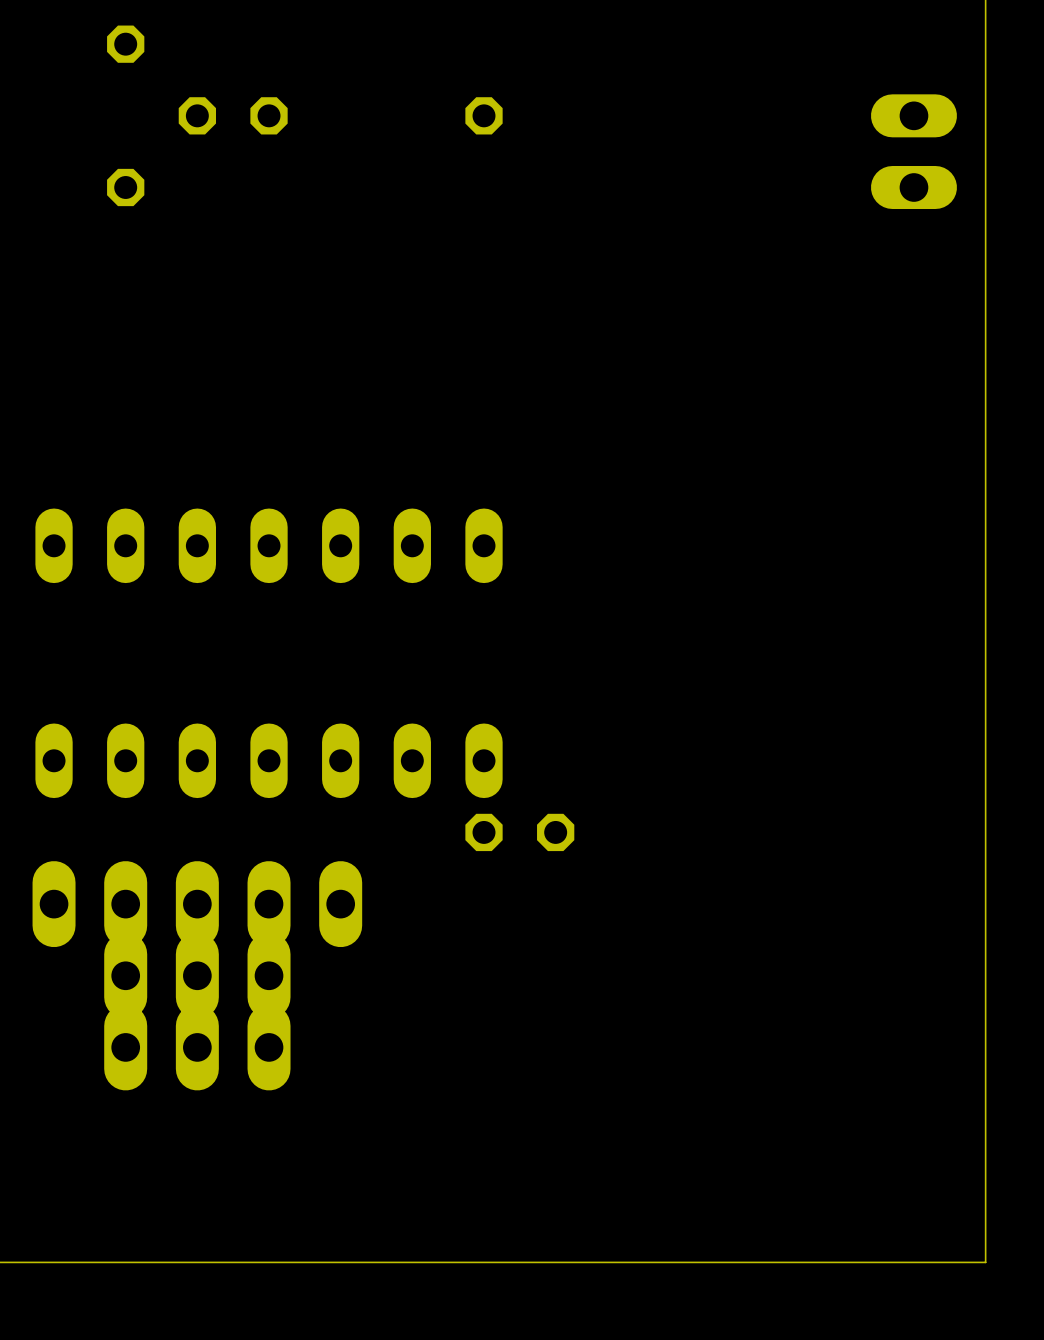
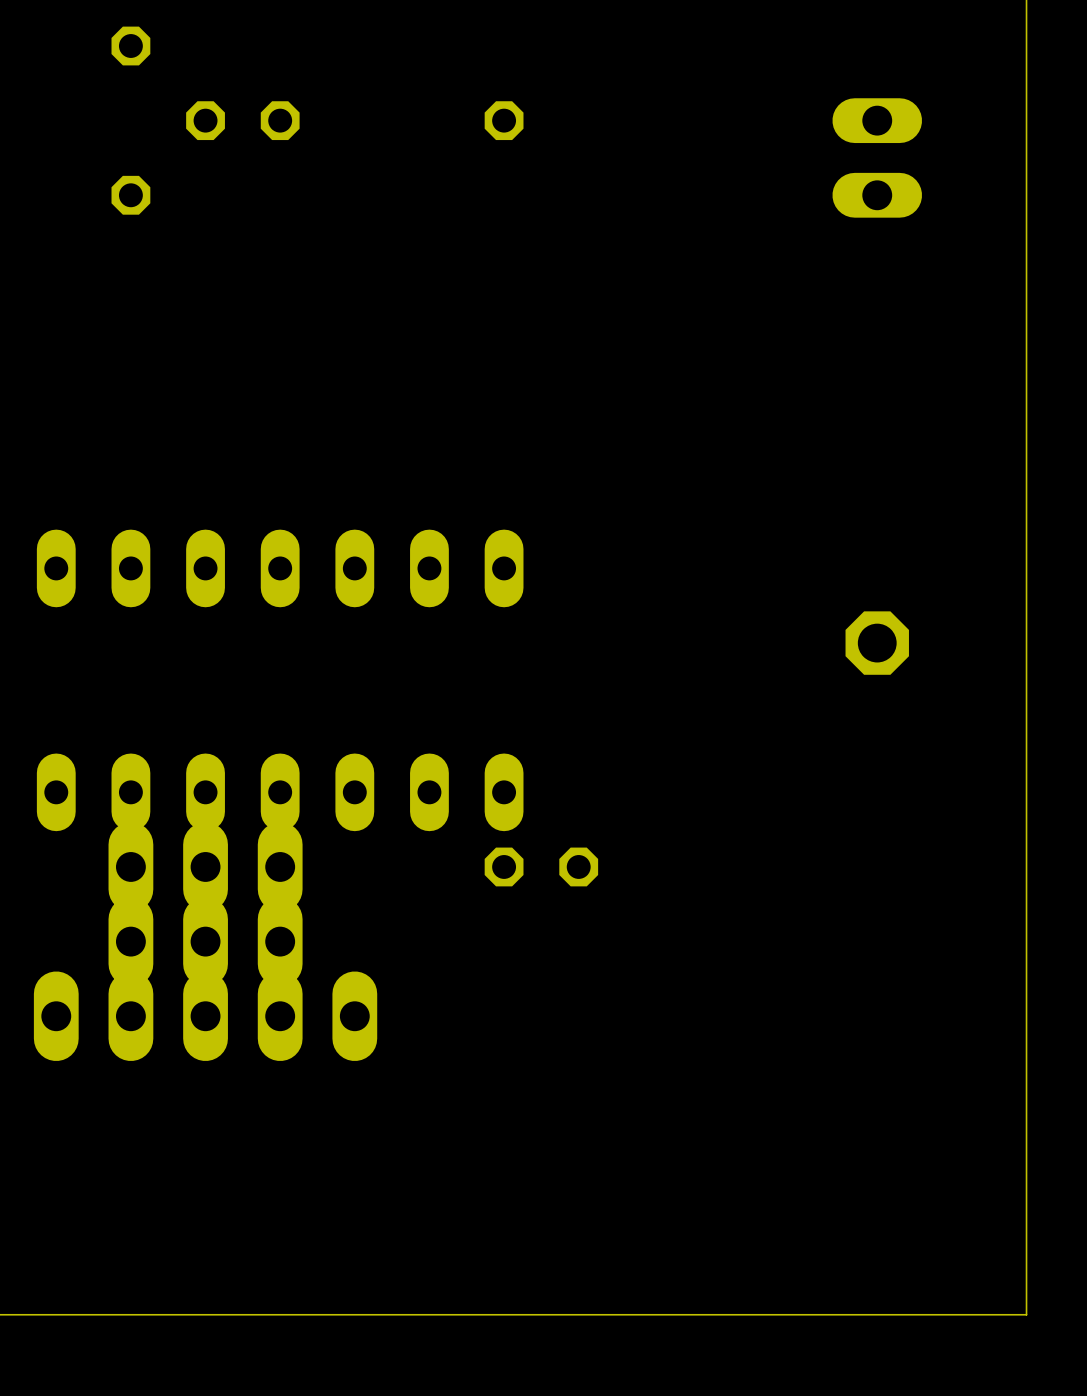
part position: (913, 151) -> (877, 157)
part: none -> (877, 643)
part footprint: [32, 861, 363, 948] -> [108, 896, 303, 987]
part footprint: [104, 932, 291, 1019] -> [33, 971, 378, 1062]
part position: (197, 1047) -> (205, 866)

